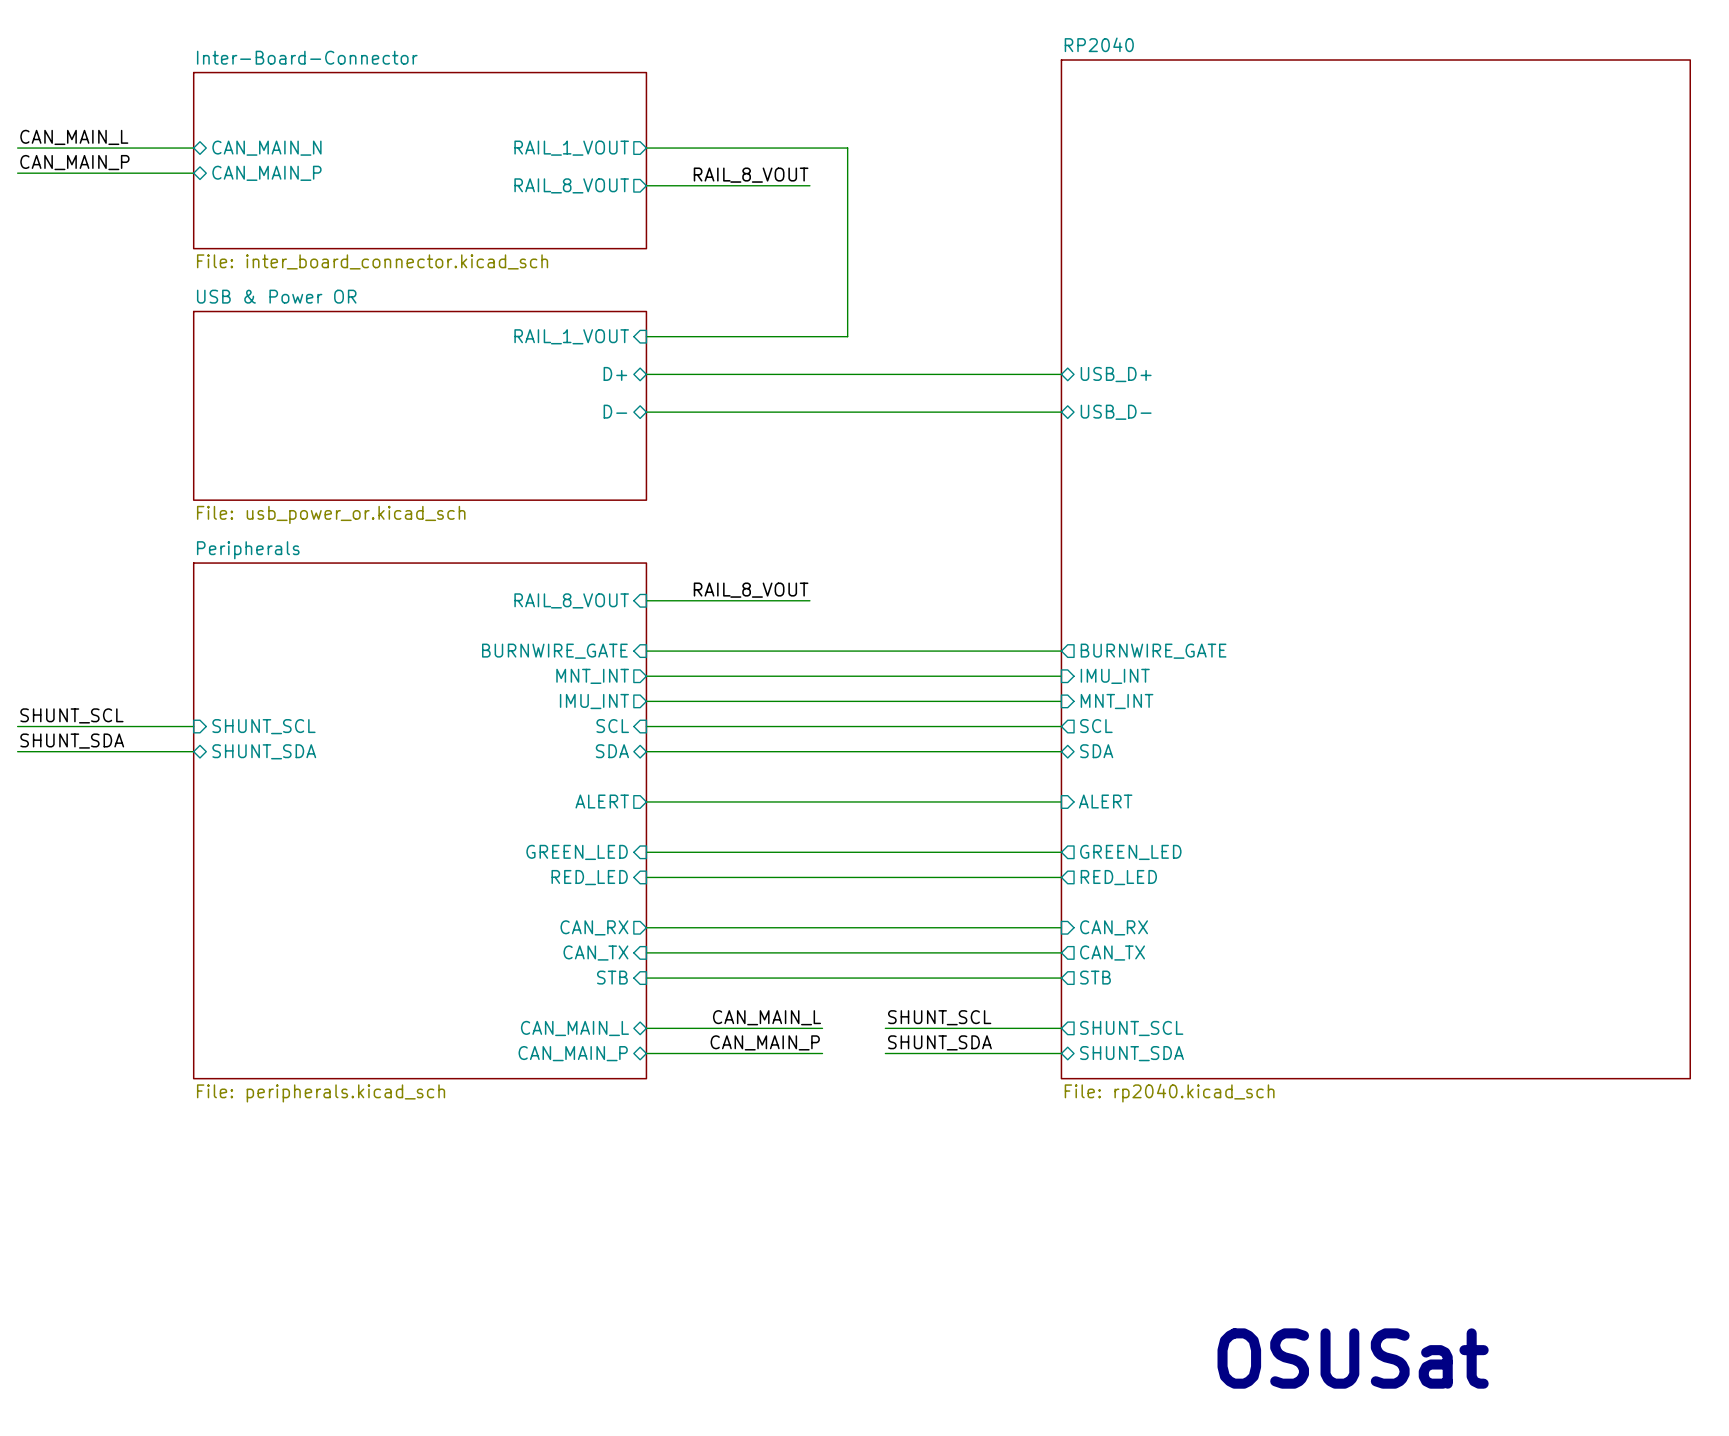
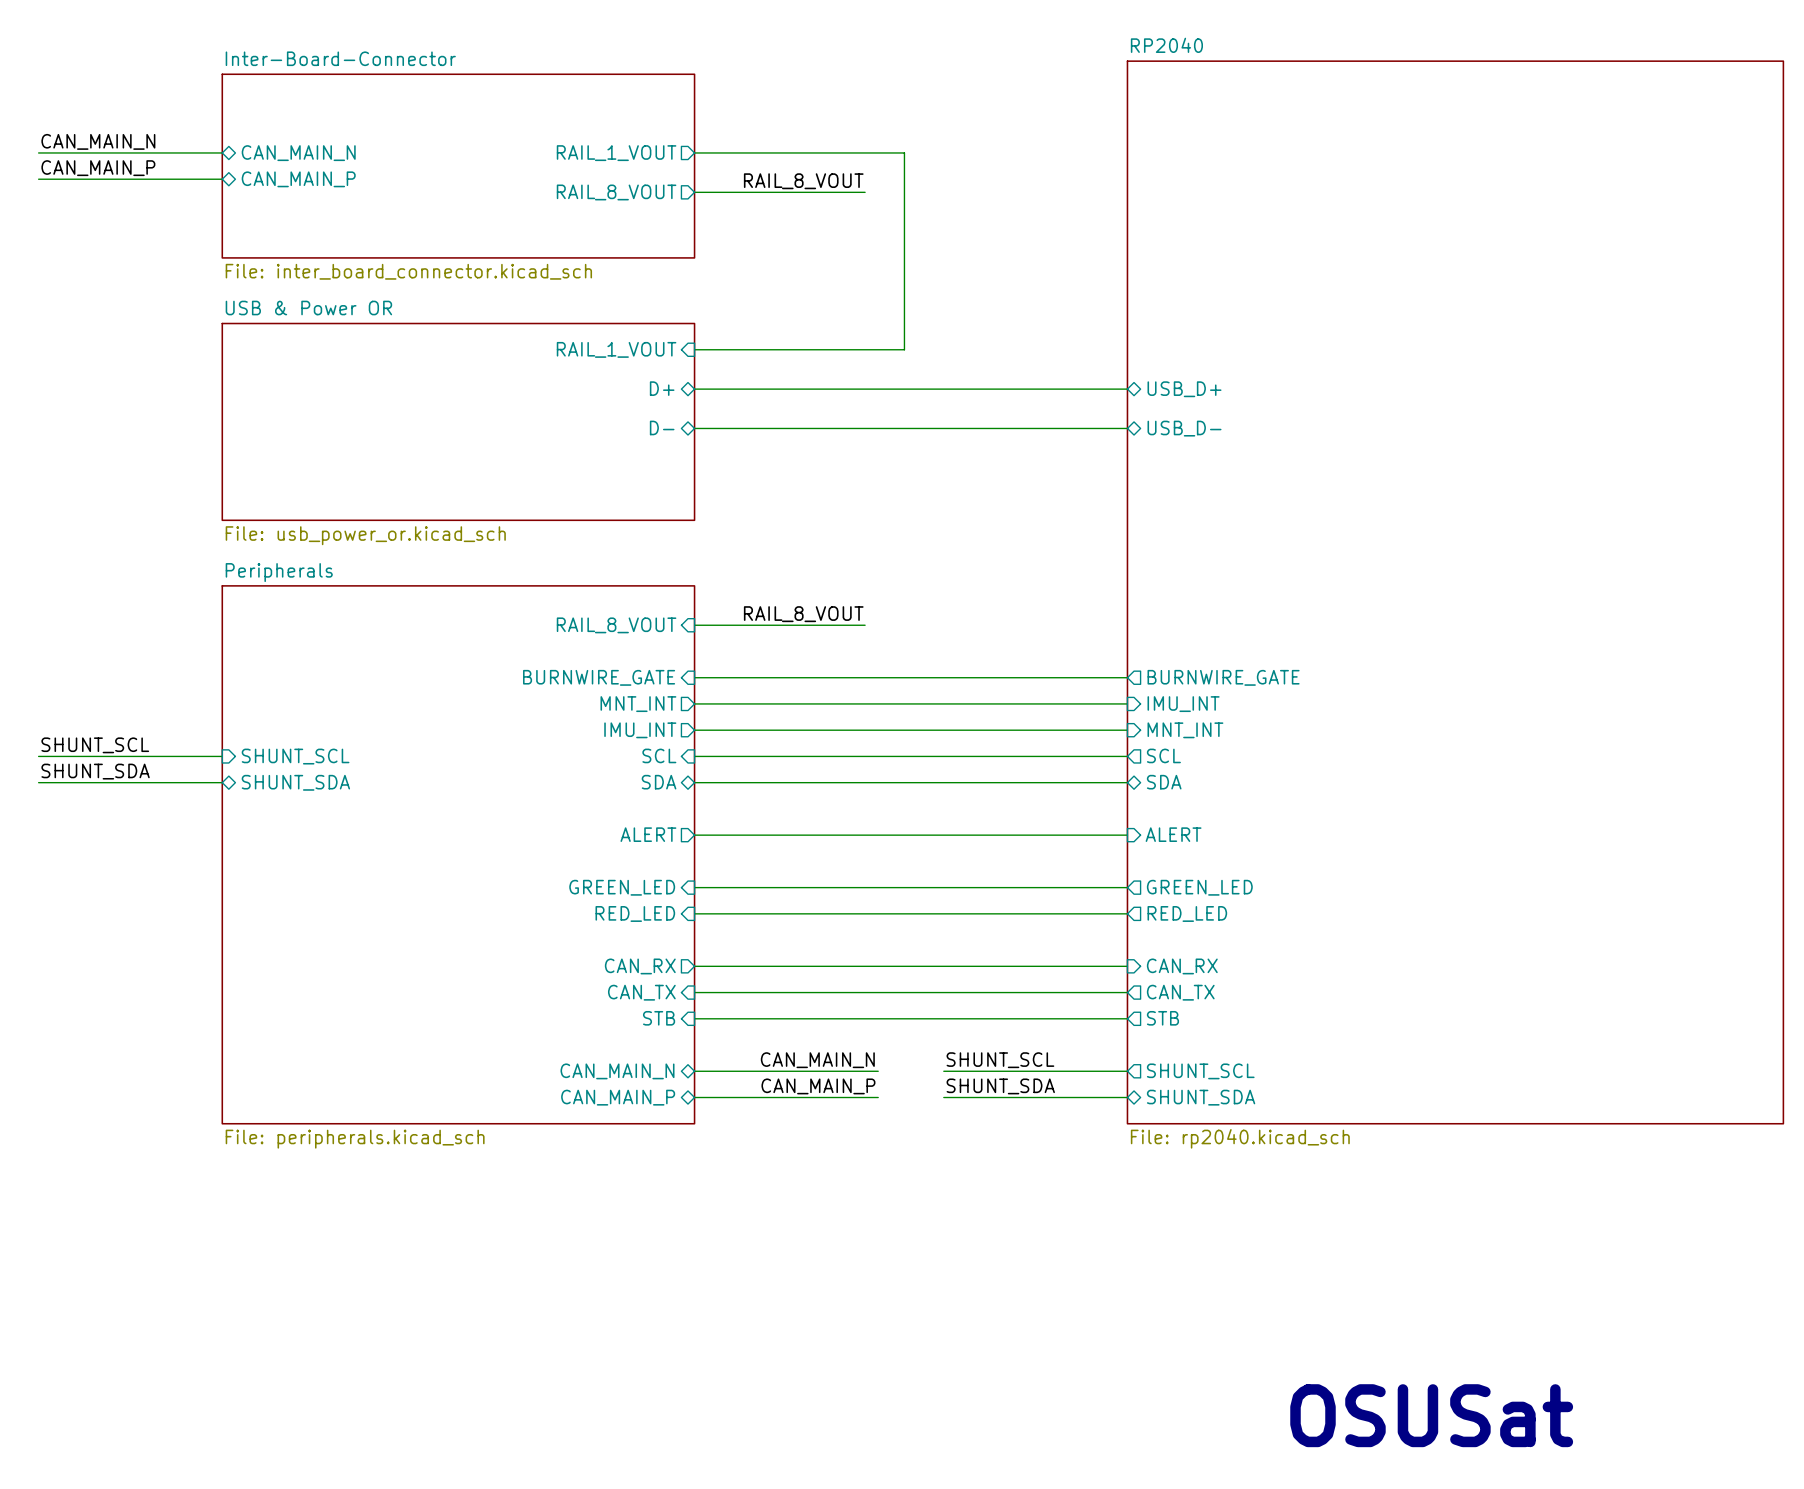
label: CAN_MAIN_L (74, 137) -> CAN_MAIN_N (98, 141)
label: CAN_MAIN_L (767, 1017) -> CAN_MAIN_N (817, 1060)
sheet pin: CAN_MAIN_L (574, 1028) -> CAN_MAIN_N (617, 1071)

